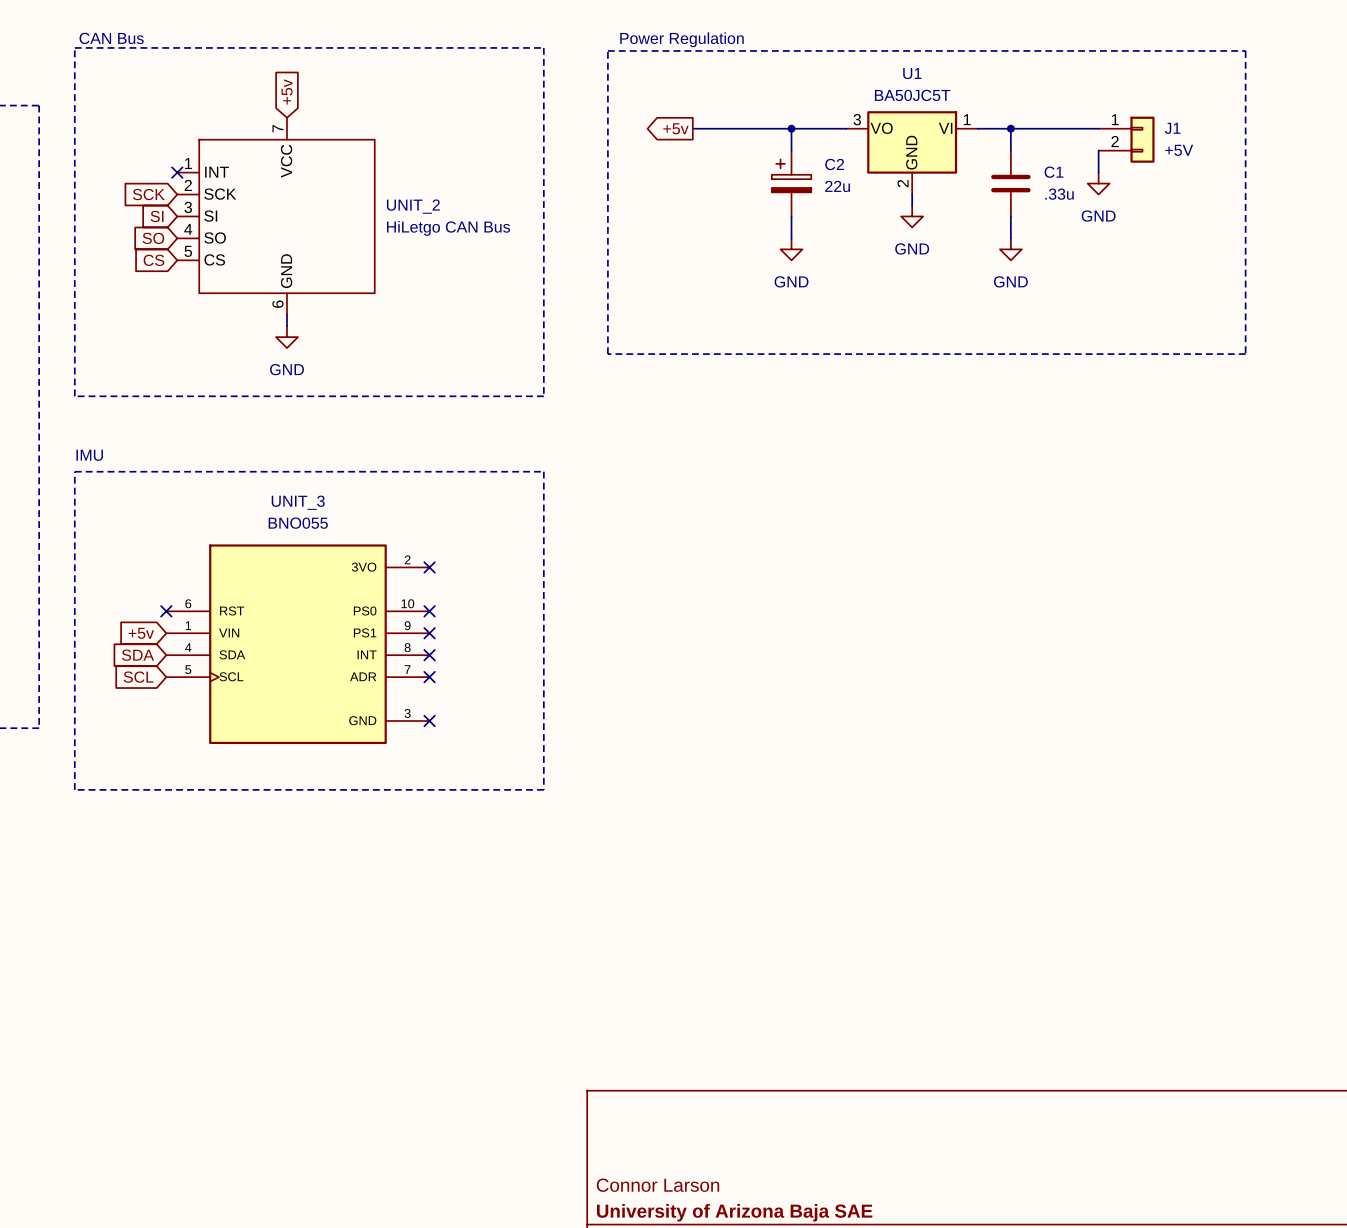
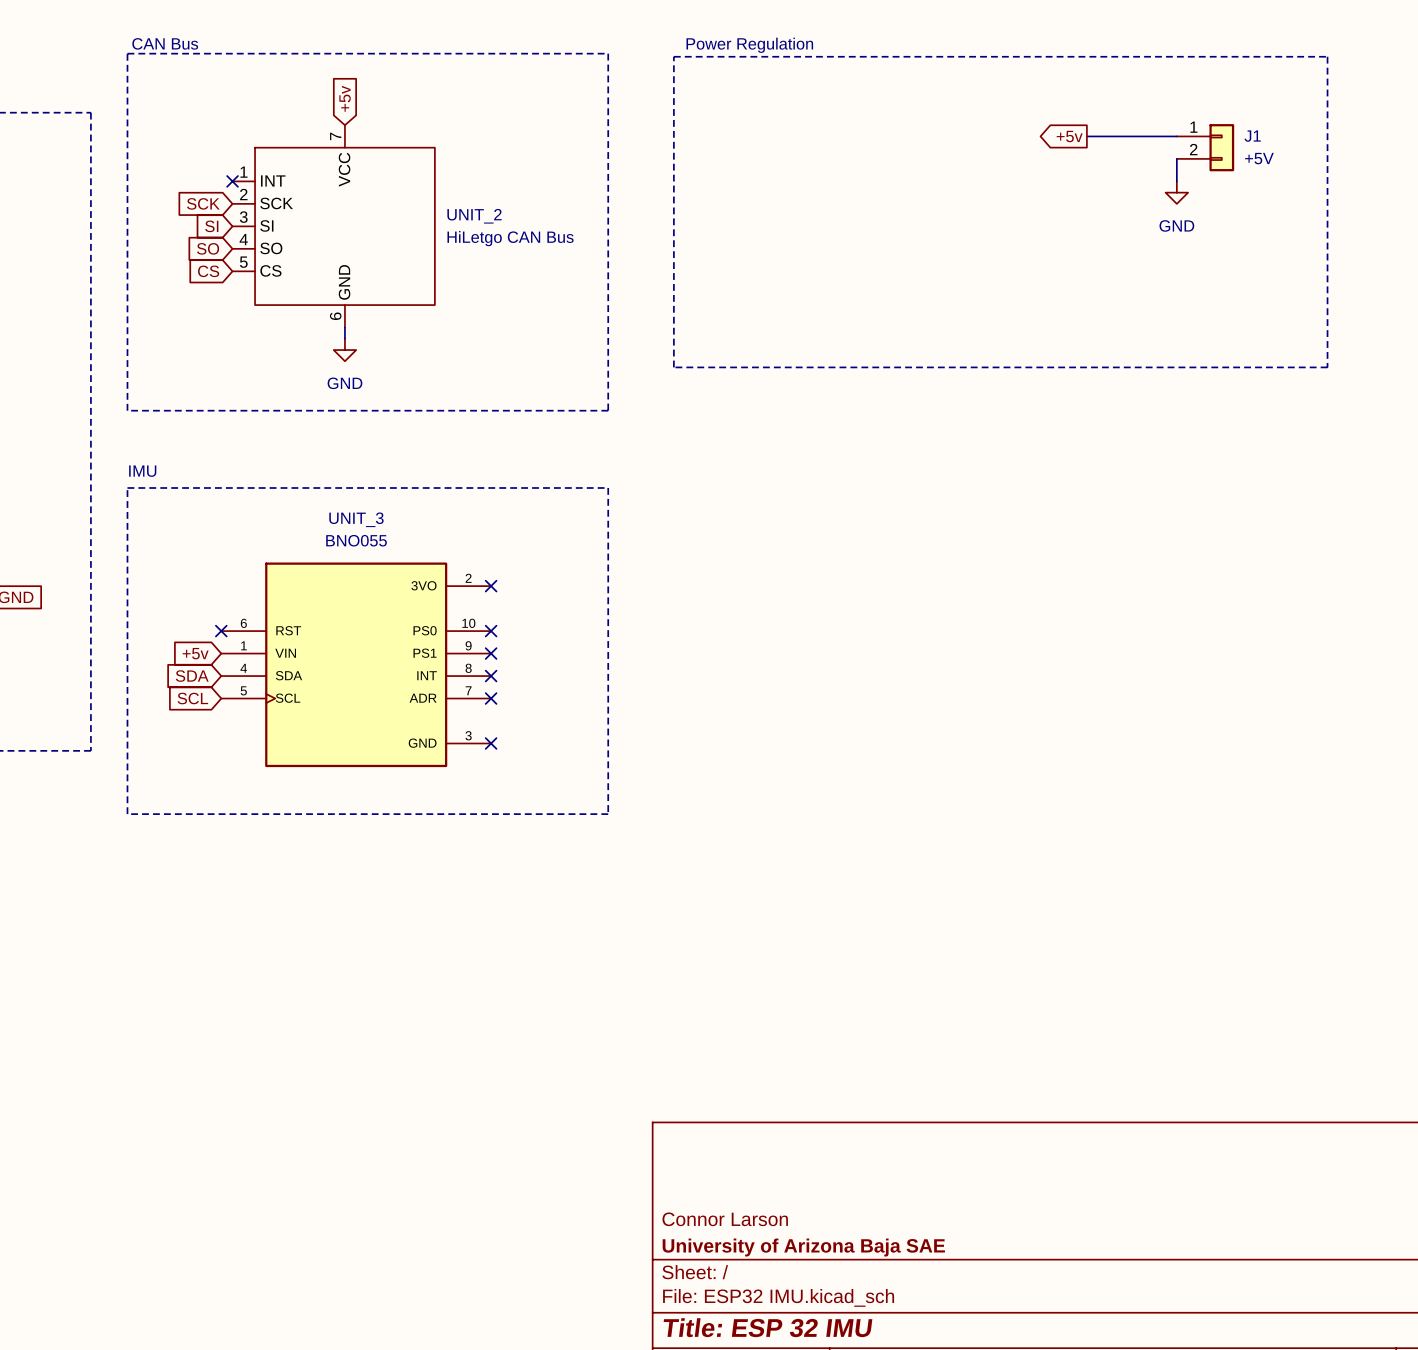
global label: +5v (675, 128) -> none
wire: (692, 128) (846, 128) -> none
wire: (791, 128) (791, 150) -> none
junction: (791, 128) -> none
wire: (977, 128) (1010, 128) (1010, 150) -> none
global label: none -> +5v (1069, 136)
junction: (1010, 128) -> none
U1: BA50JC5T (912, 152) -> none
C2: 22u (791, 183) -> none
C1: .33u (1010, 183) -> none
wire: (912, 194) (912, 205) -> none
wire: (791, 216) (791, 238) -> none
power symbol: GND (912, 216) -> none
wire: (1010, 216) (1010, 238) -> none
power symbol: GND (791, 249) -> none
power symbol: GND (1010, 249) -> none

